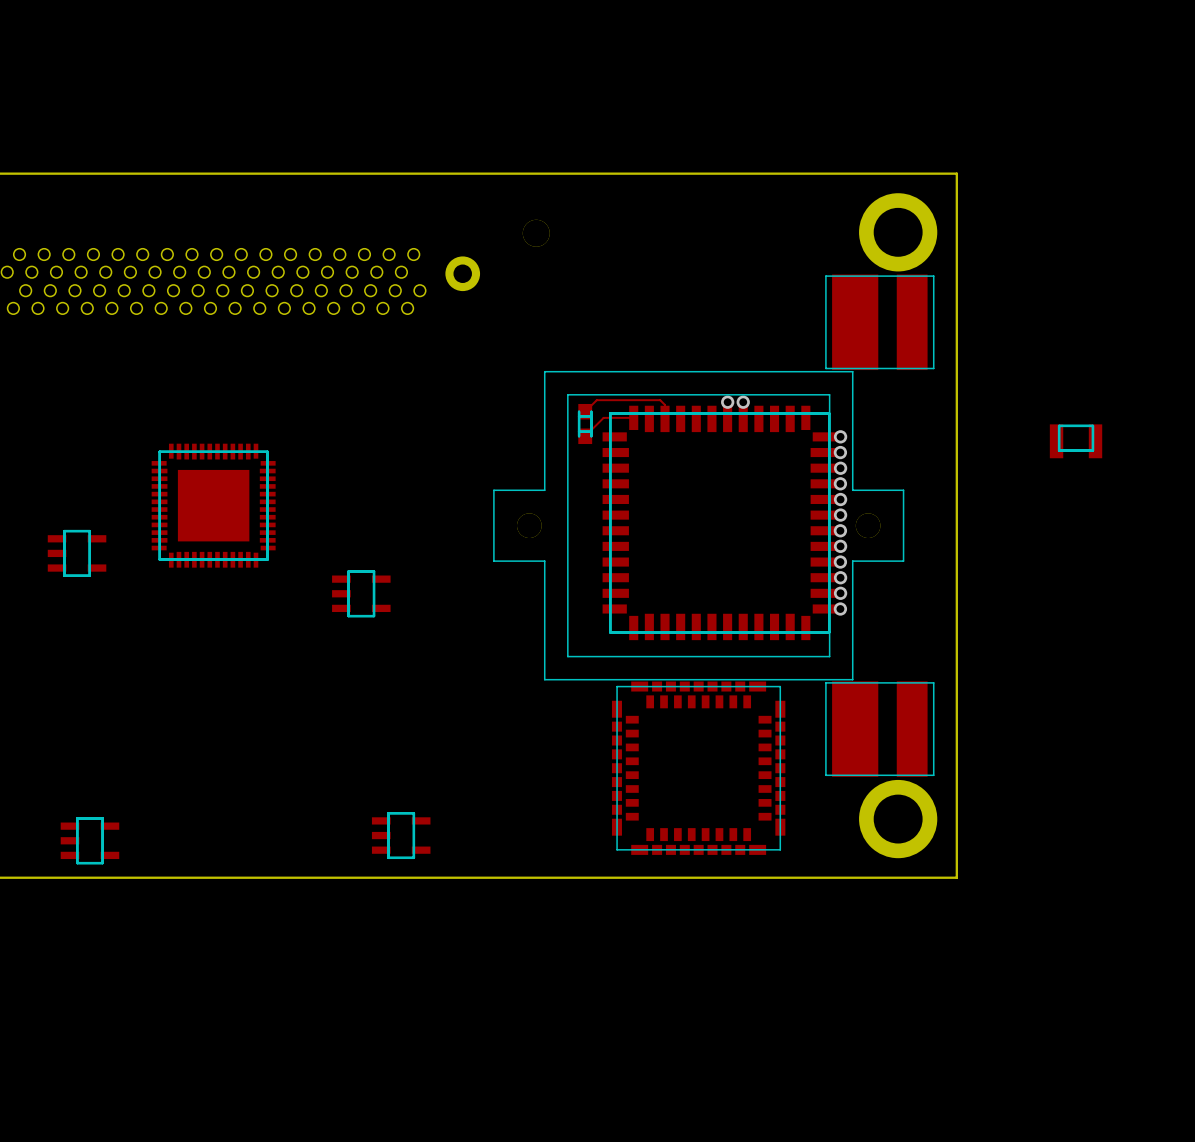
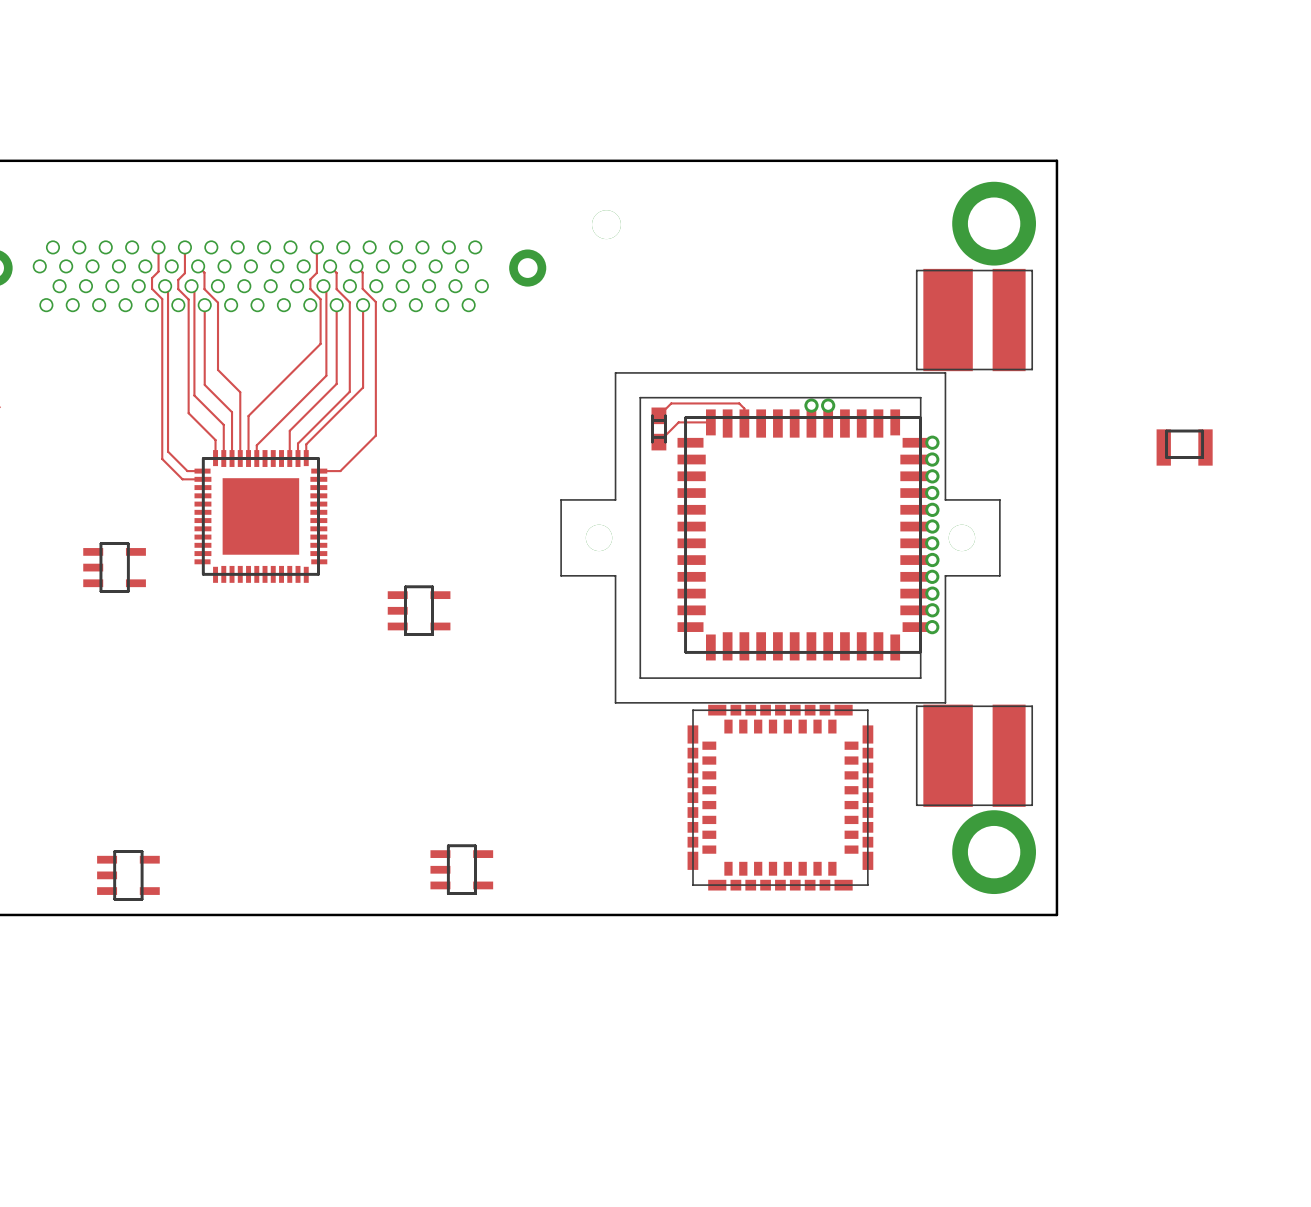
track: none -> (158, 247) (158, 271) (152, 278) (152, 288) (162, 299) (162, 459) (182, 479) (202, 479)
track: none -> (184, 247) (184, 273) (178, 279) (178, 289) (188, 299) (188, 413) (215, 440) (215, 458)
track: none -> (316, 247) (316, 272) (310, 279) (310, 288) (320, 299) (320, 343) (248, 415) (248, 458)
track: none -> (198, 266) (204, 272) (204, 289) (218, 302) (218, 369) (240, 392) (240, 458)
track: none -> (330, 266) (336, 272) (336, 289) (349, 302) (349, 391) (298, 443) (298, 458)
track: none -> (356, 266) (362, 272) (362, 288) (375, 302) (375, 435) (340, 471) (319, 471)
track: none -> (165, 286) (168, 289) (168, 451) (187, 471) (202, 471)
track: none -> (191, 286) (194, 289) (194, 395) (223, 424) (223, 458)
track: none -> (323, 286) (326, 289) (326, 375) (256, 445) (256, 458)
track: none -> (204, 305) (204, 384) (232, 412) (232, 458)
track: none -> (336, 305) (336, 383) (289, 430) (289, 458)
track: none -> (363, 305) (363, 387) (306, 444) (306, 458)

